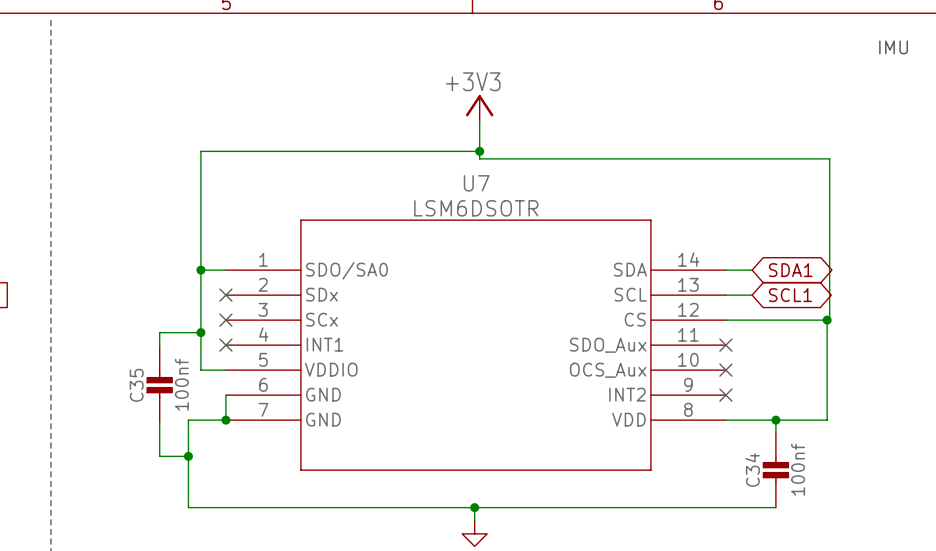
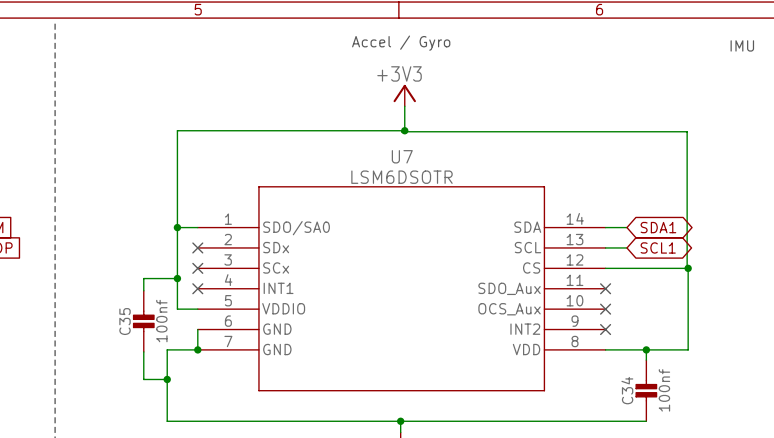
text: none -> Accel / Gyro (401, 43)
wire: none -> (401, 130) (687, 131) (687, 268)
wire: (479, 151) (479, 158) (829, 158) (829, 320) (827, 320) -> none

